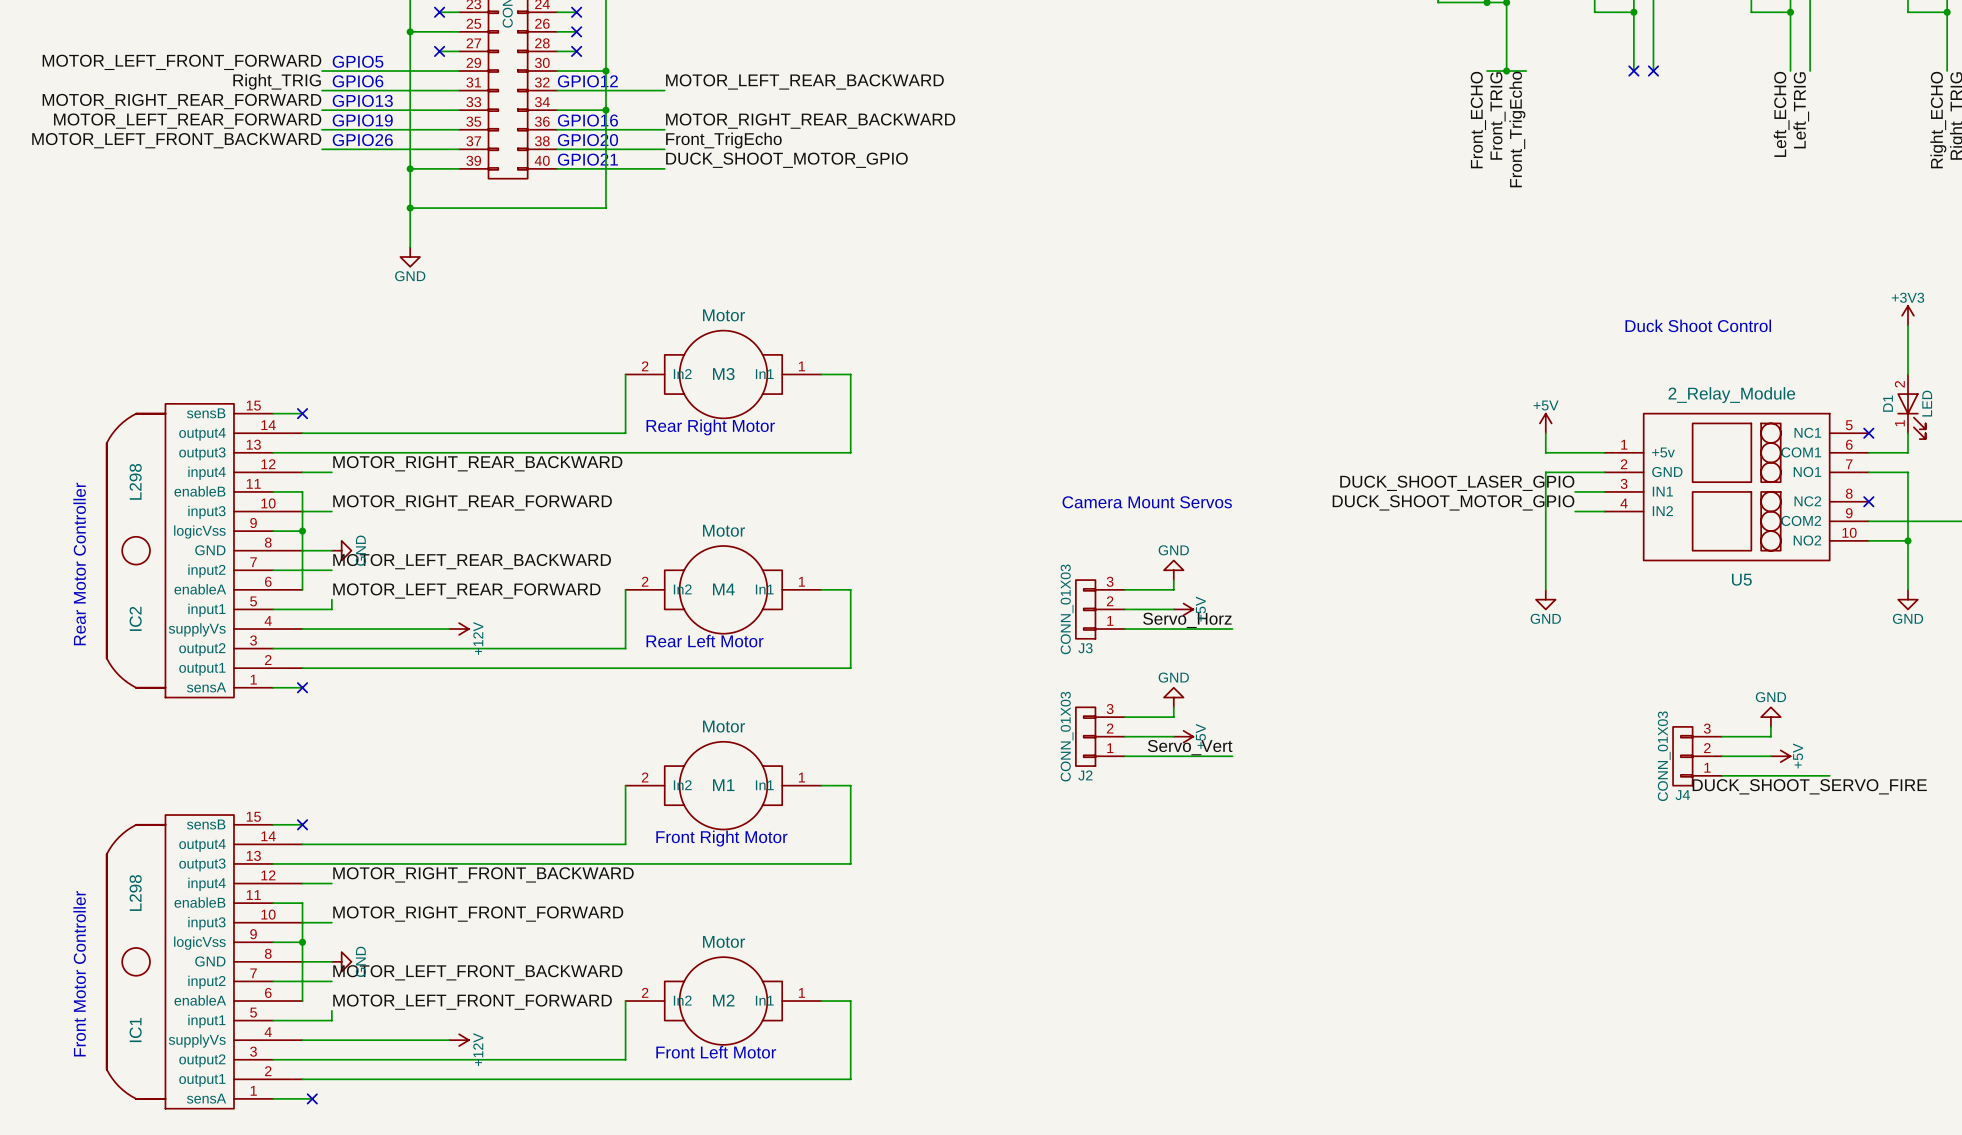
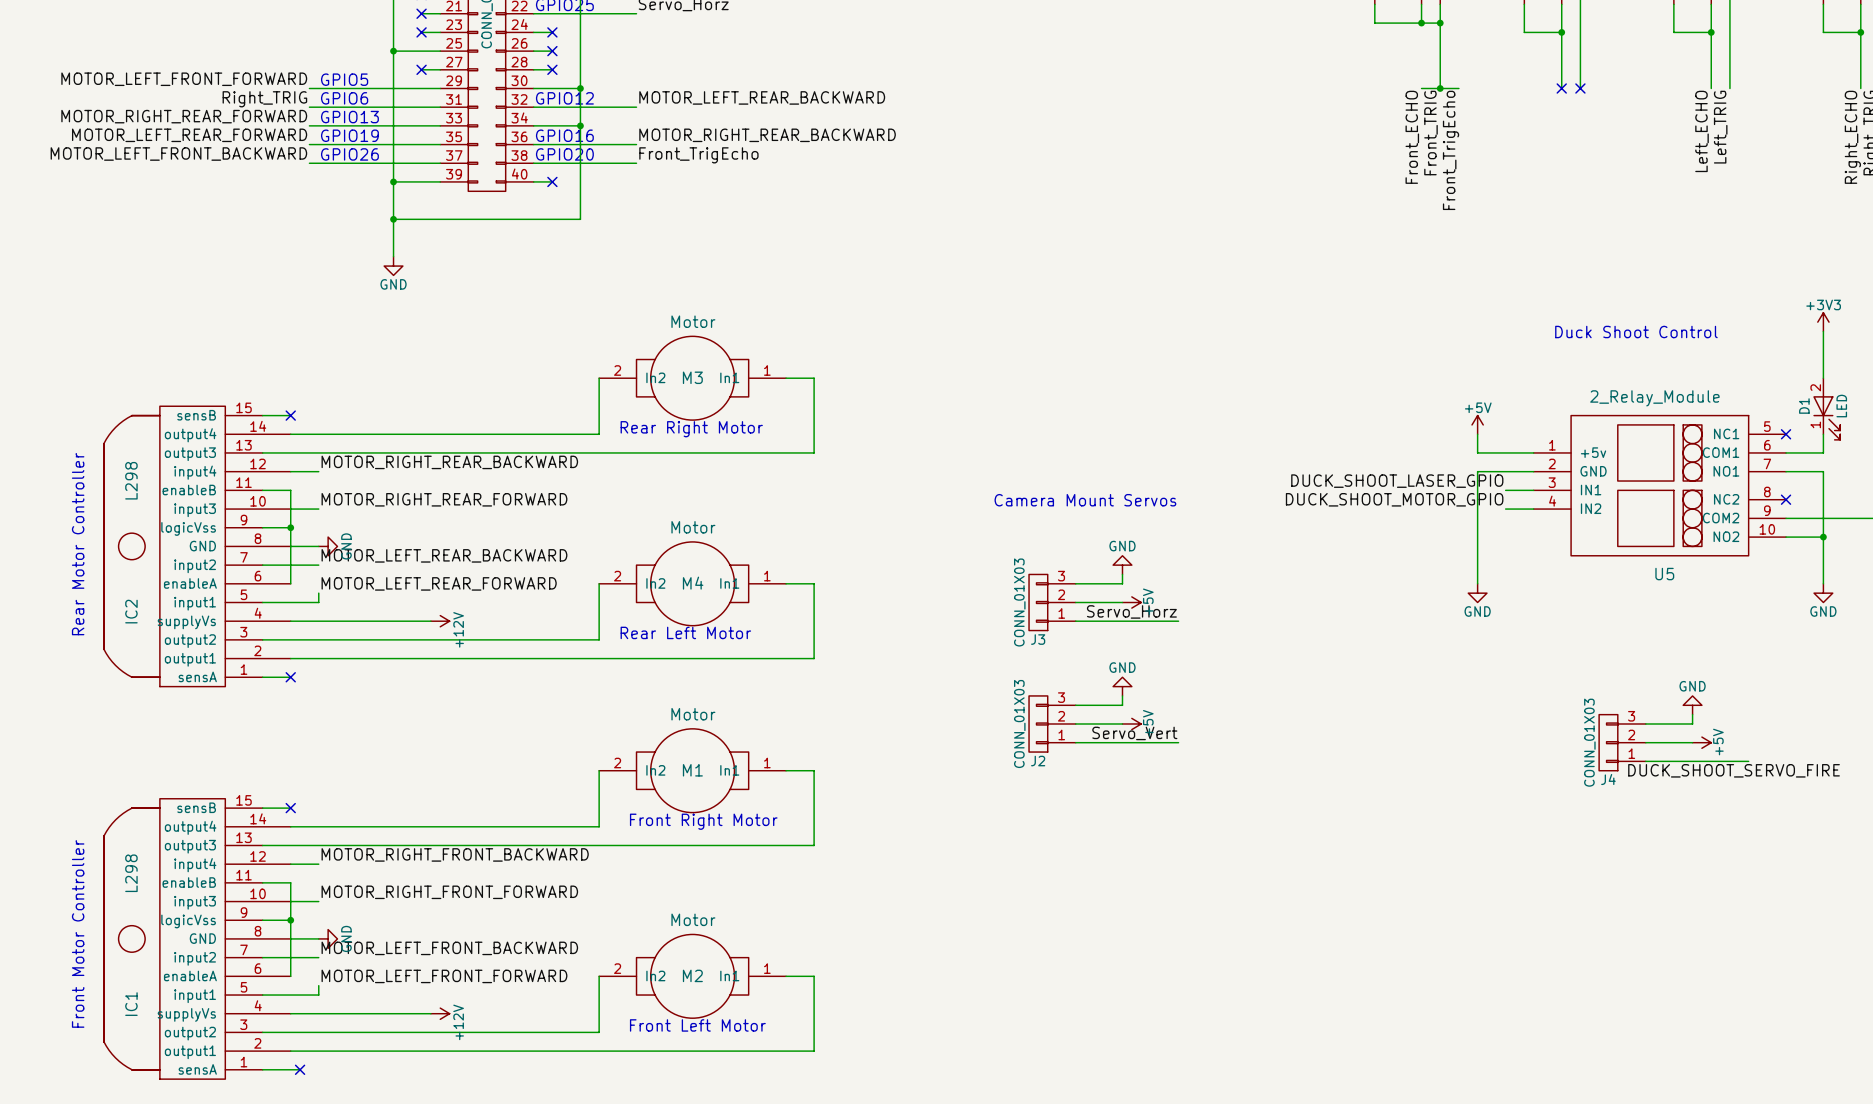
text: GPIO21 (587, 159) -> none
label: DUCK_SHOOT_MOTOR_GPIO (786, 160) -> none
wire: (576, 168) (664, 168) -> none
no-connect mark: none -> (552, 181)

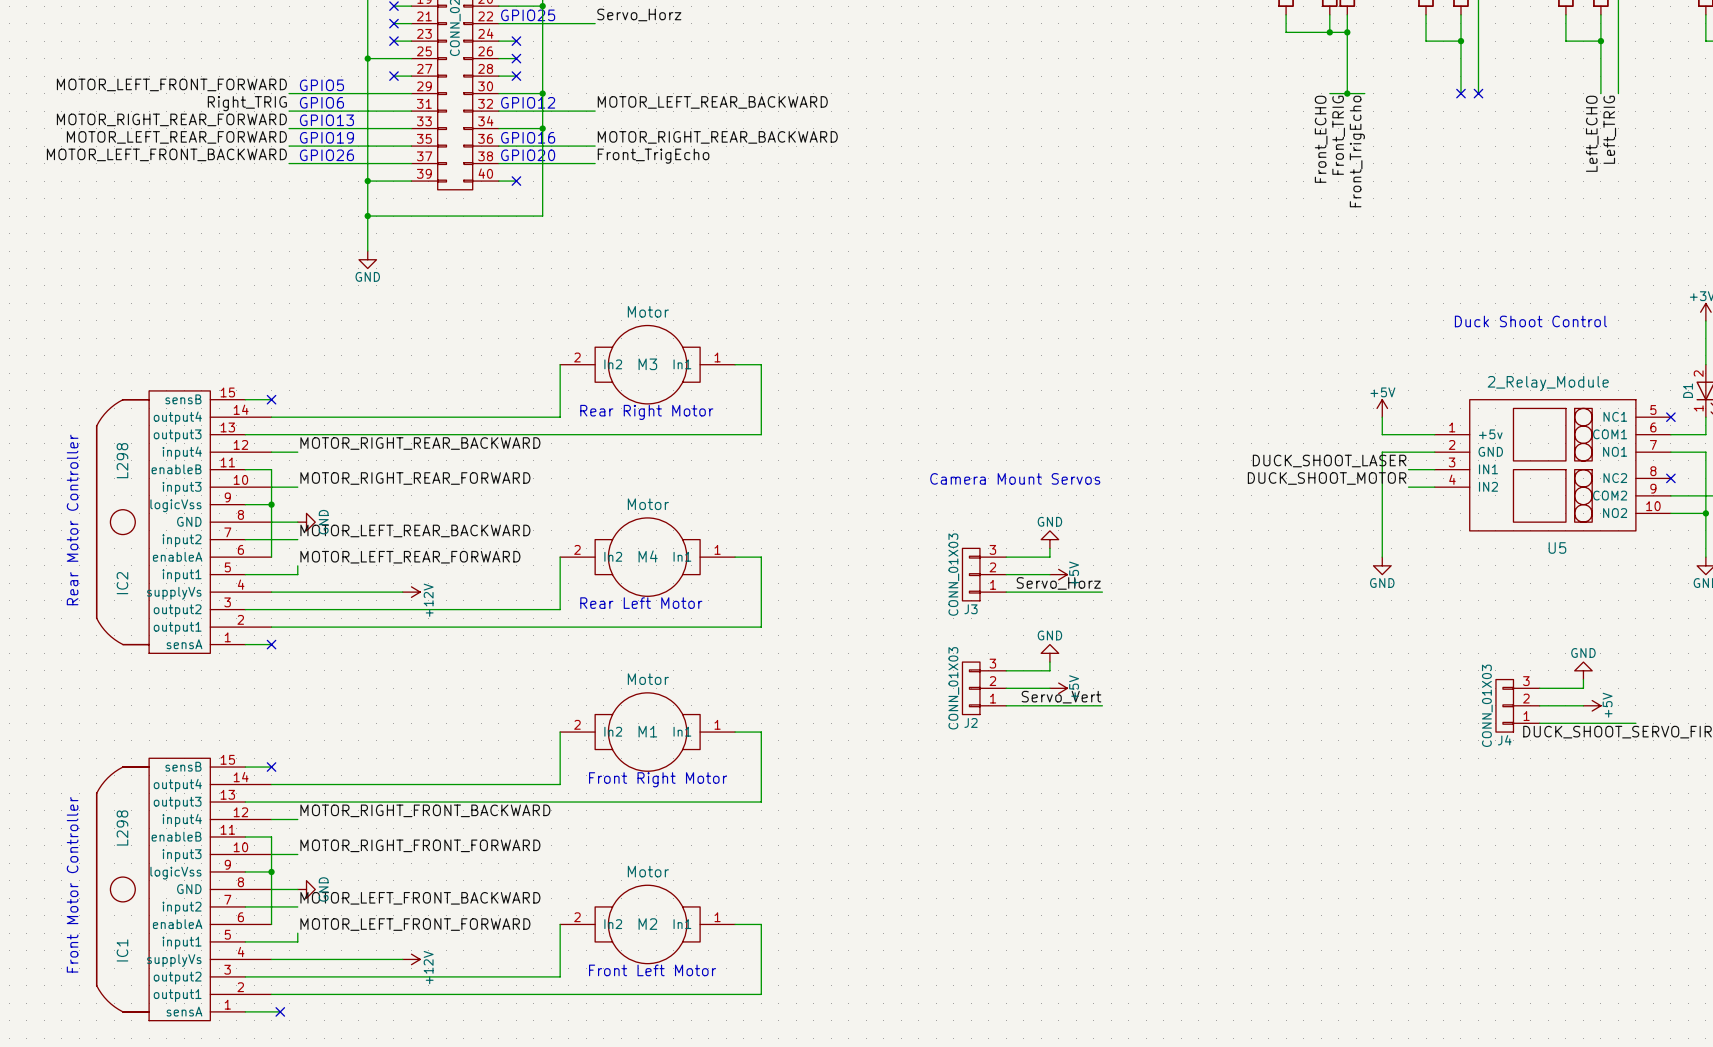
label: DUCK_SHOOT_LASER_GPIO (1397, 481) -> DUCK_SHOOT_LASER (1329, 461)
label: DUCK_SHOOT_MOTOR_GPIO (1394, 499) -> DUCK_SHOOT_MOTOR (1327, 478)

